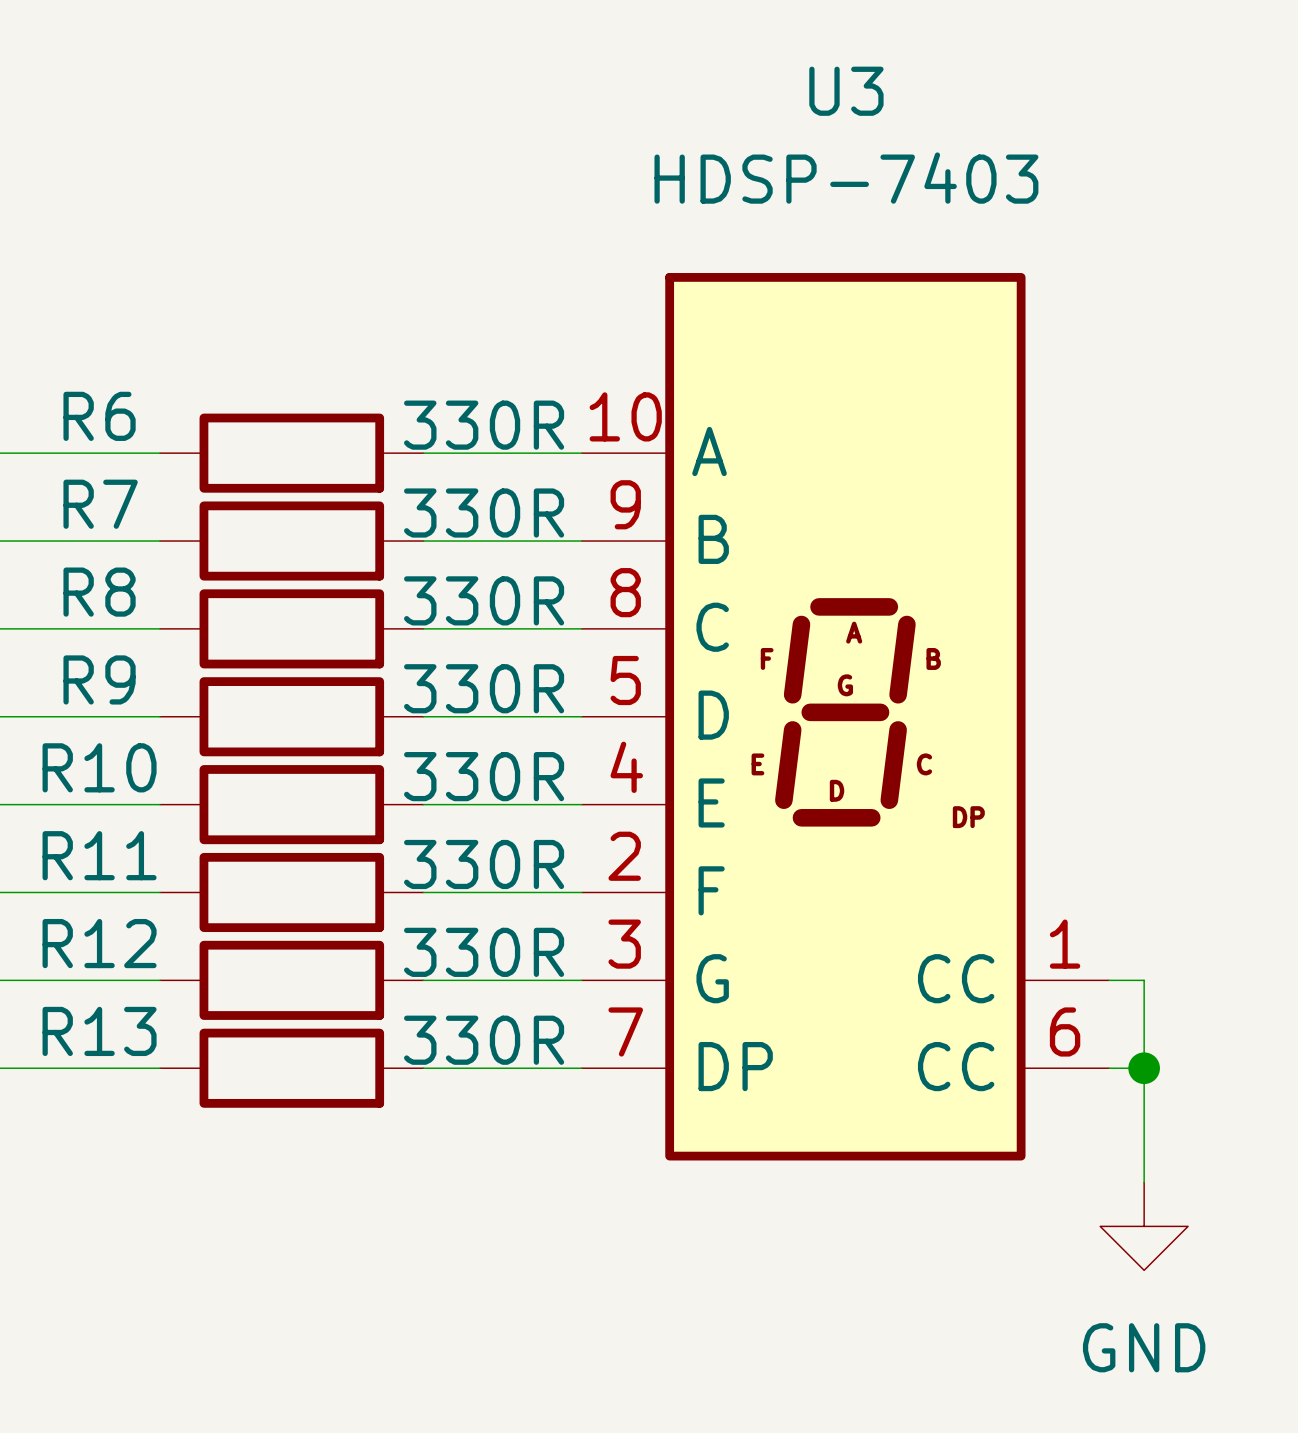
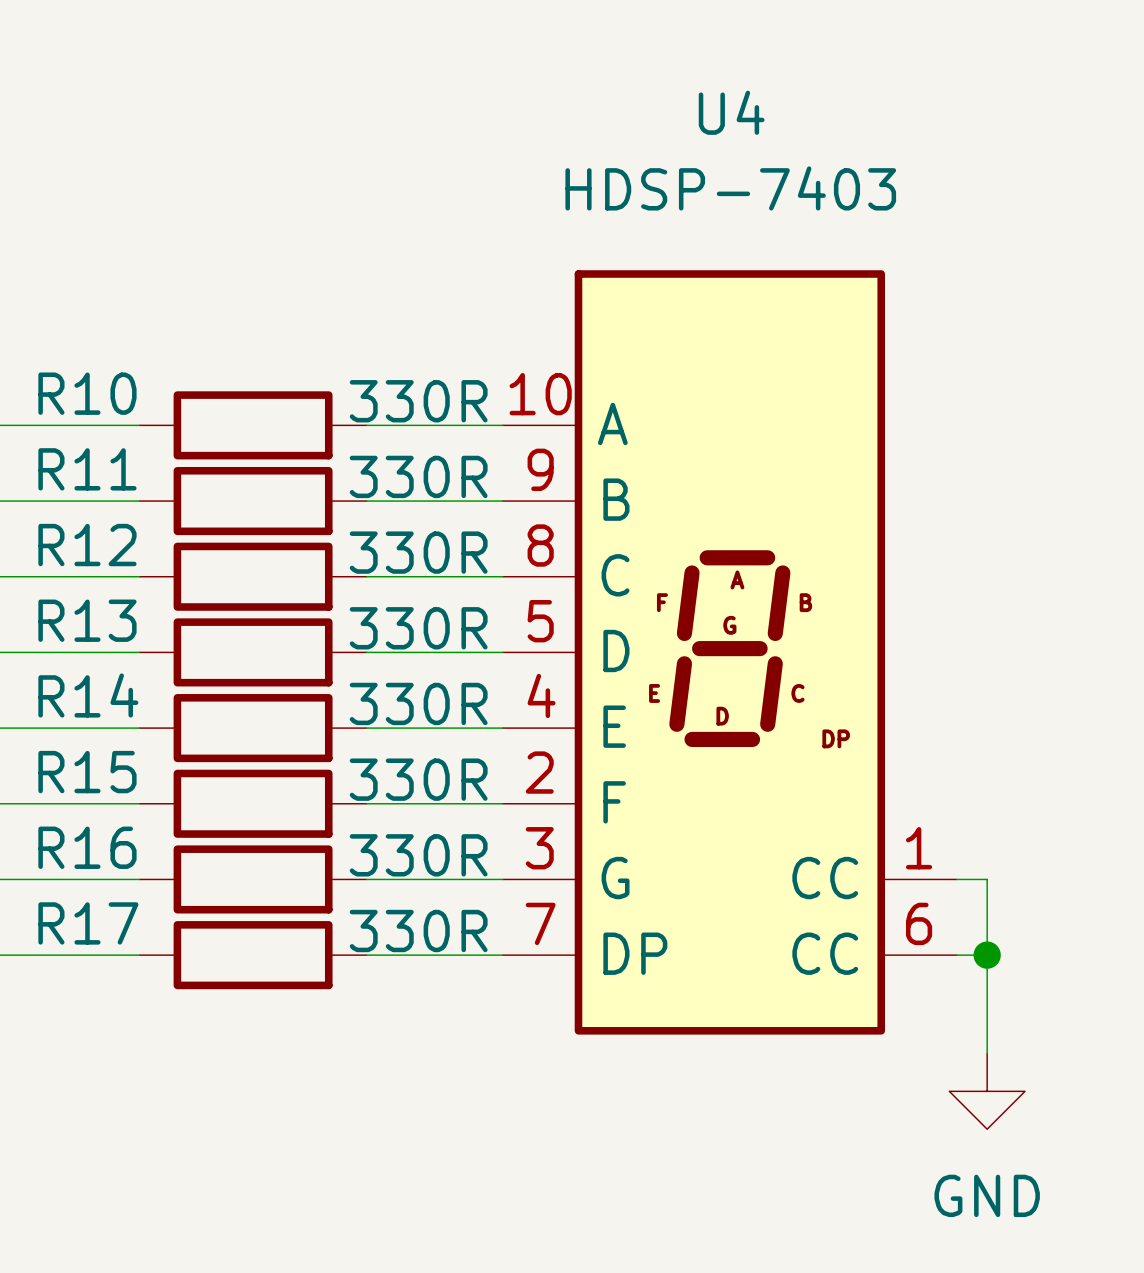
U3 name: U3 (846, 91) -> U4 (731, 112)
R6 name: R6 (99, 416) -> R10 (87, 393)
R7 name: R7 (100, 504) -> R11 (87, 469)
R8 name: R8 (99, 592) -> R12 (87, 545)
R9 name: R9 (99, 679) -> R13 (87, 620)
R10 name: R10 (99, 767) -> R14 (88, 695)
R11 name: R11 (99, 855) -> R15 (87, 772)
R12 name: R12 (99, 943) -> R16 (87, 847)
R13 name: R13 (99, 1031) -> R17 (88, 923)

